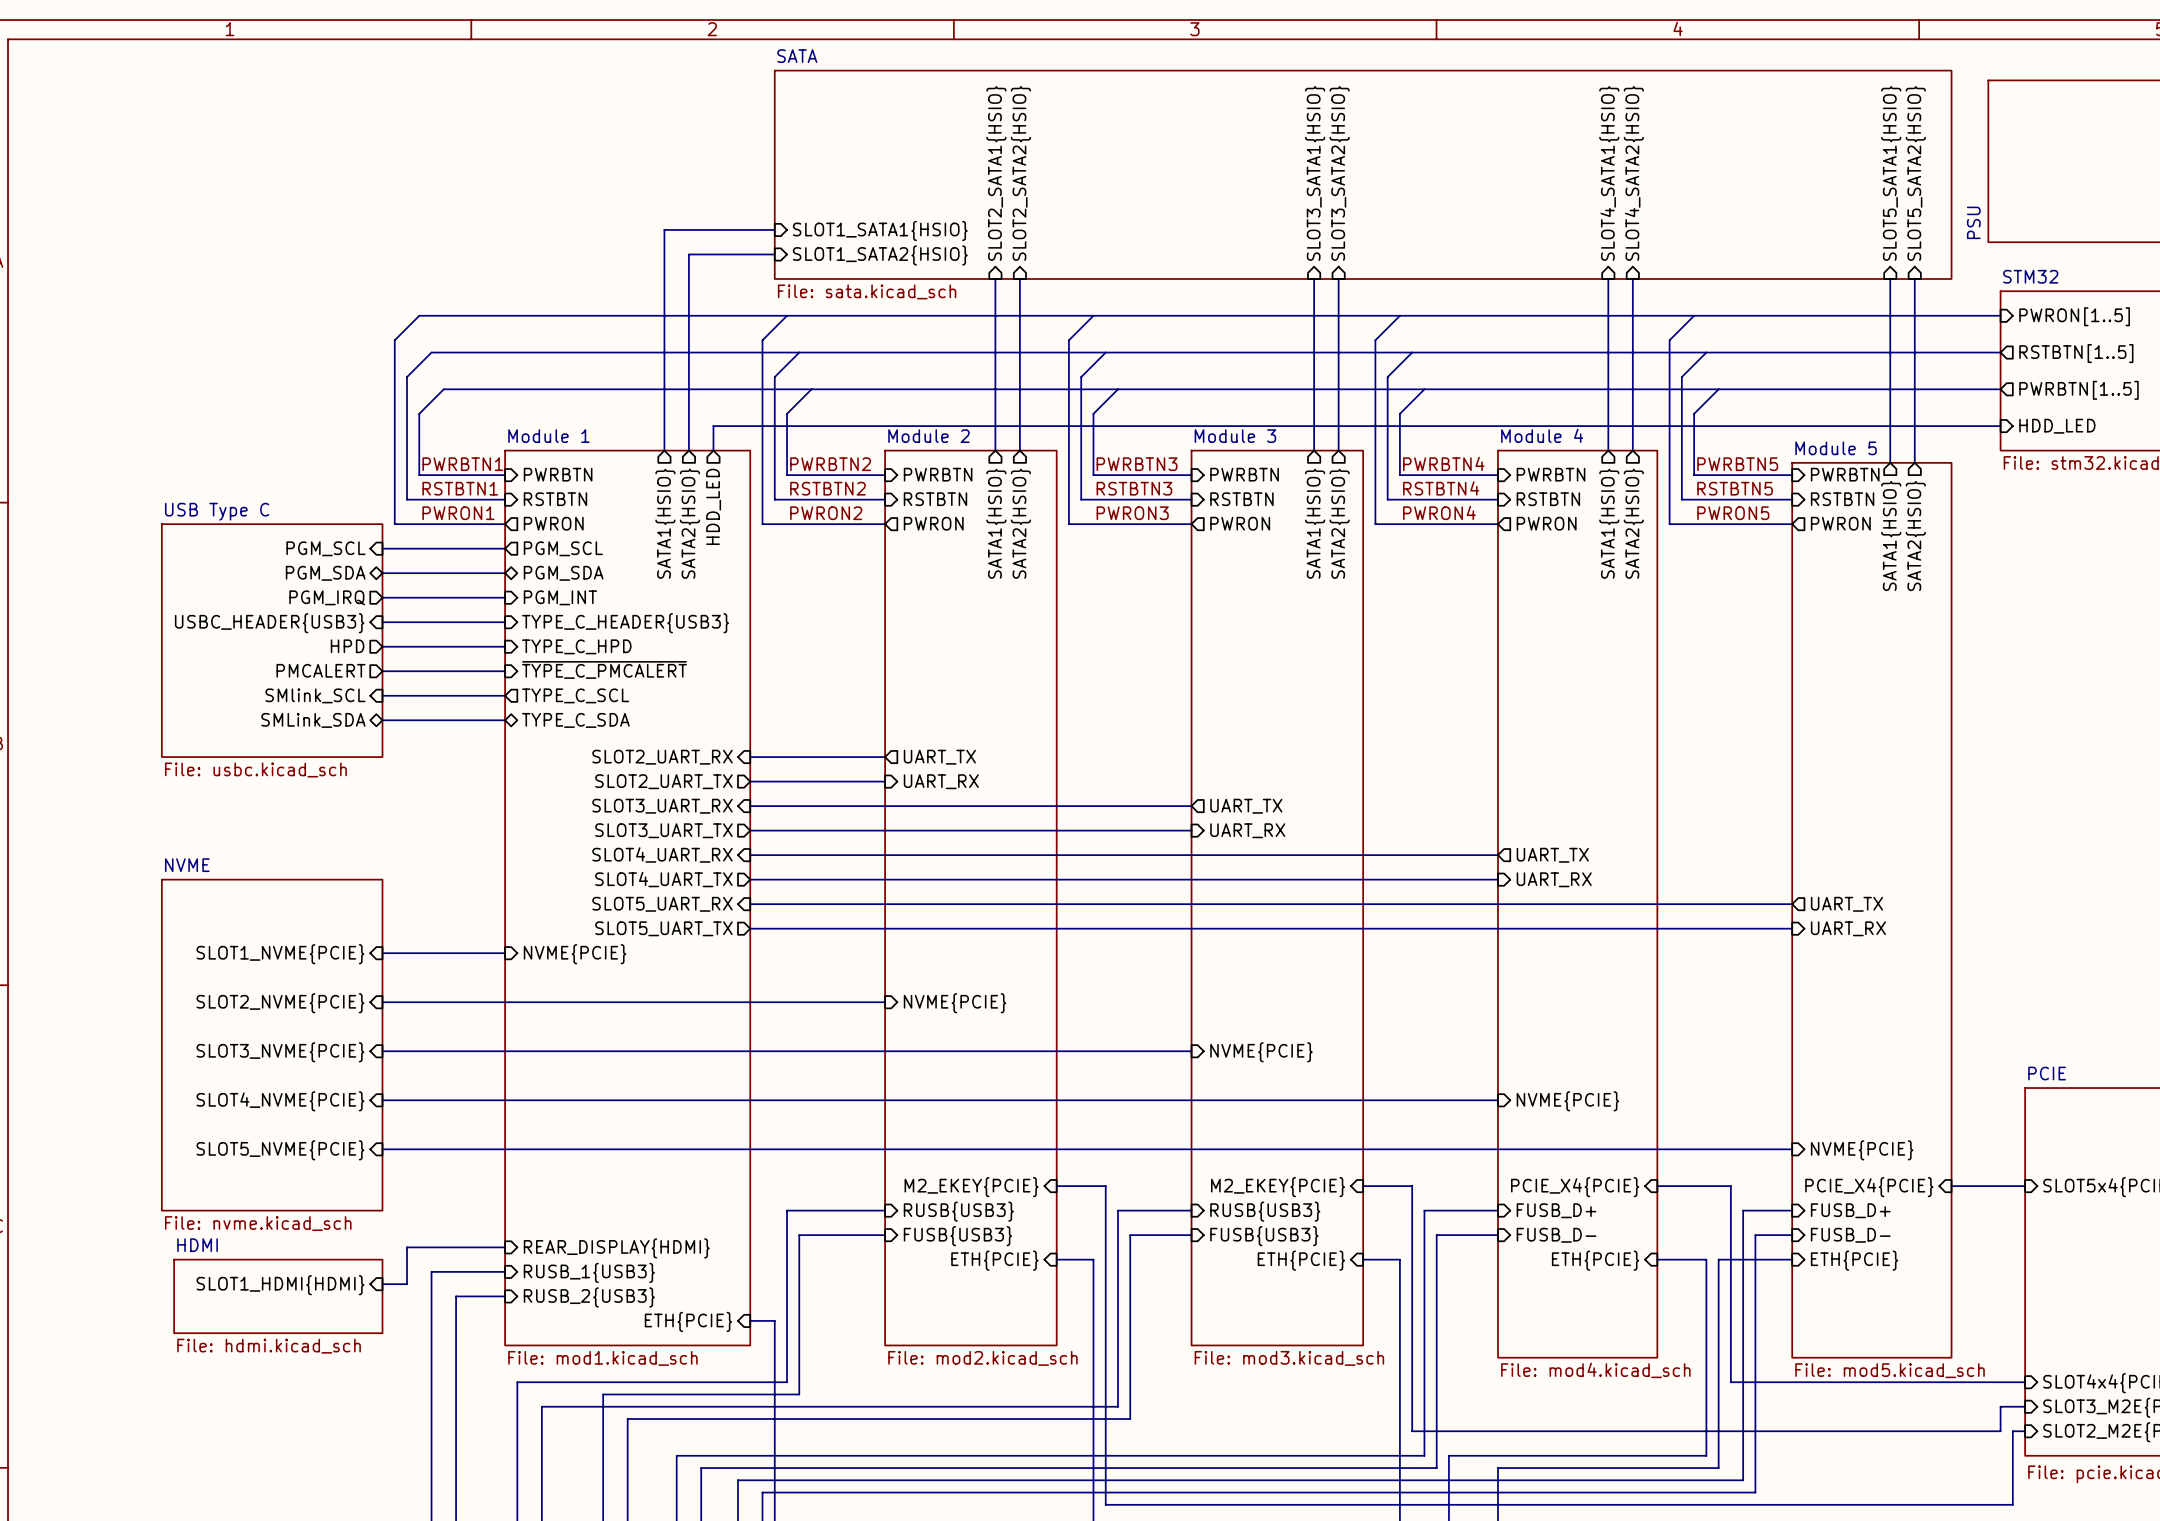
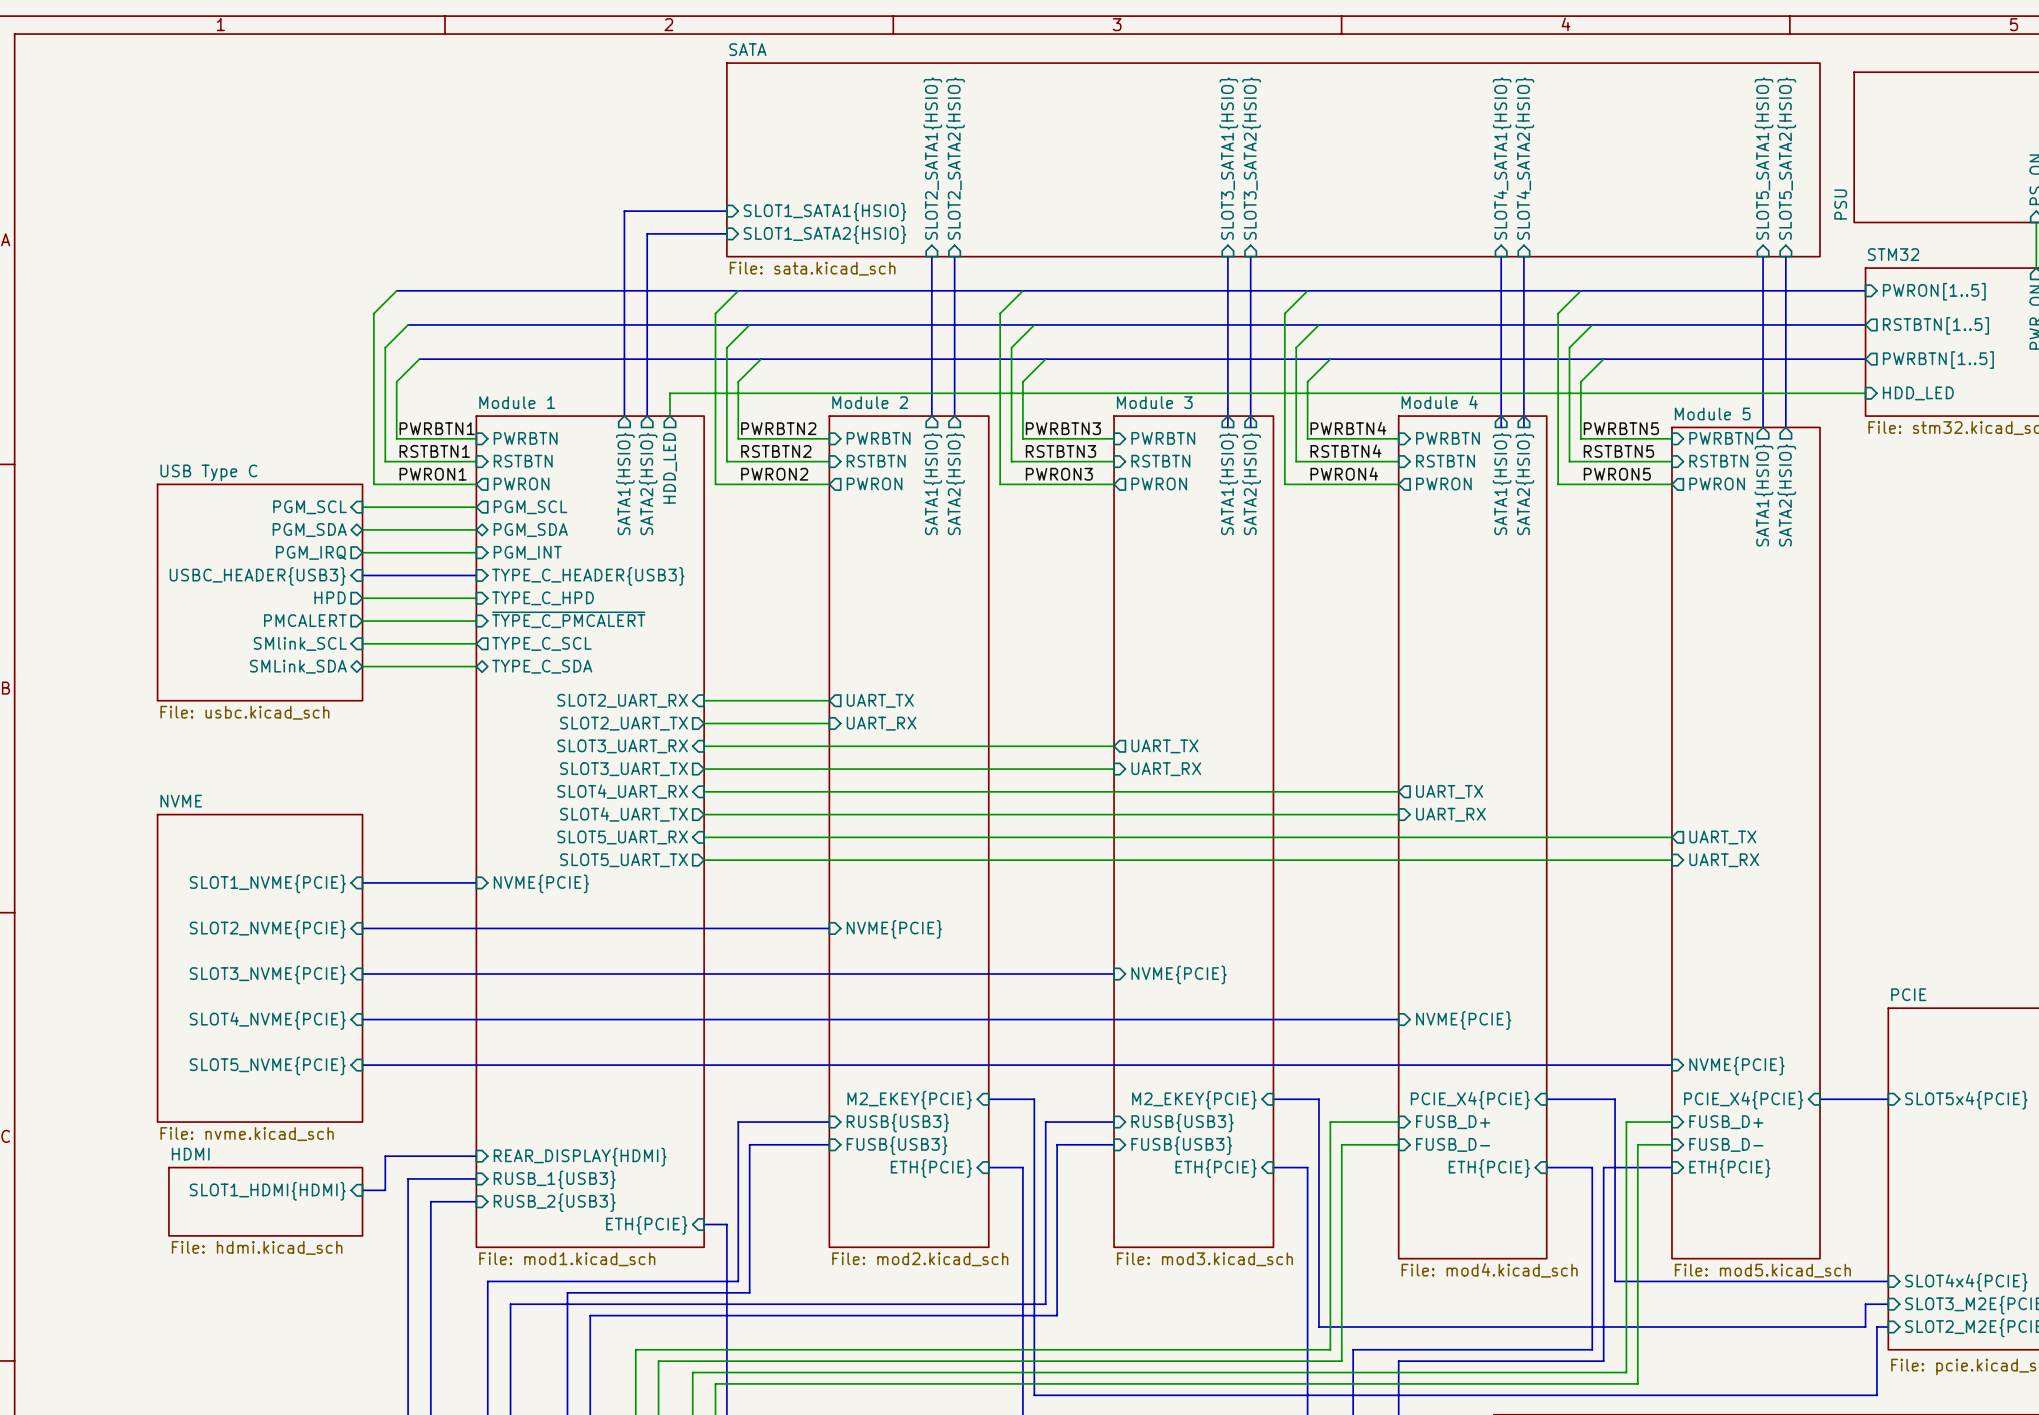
bus: none -> (1227, 416) (1227, 427)
bus: none -> (1250, 416) (1250, 427)
bus: none -> (1501, 416) (1501, 427)
bus: none -> (1523, 416) (1523, 427)

